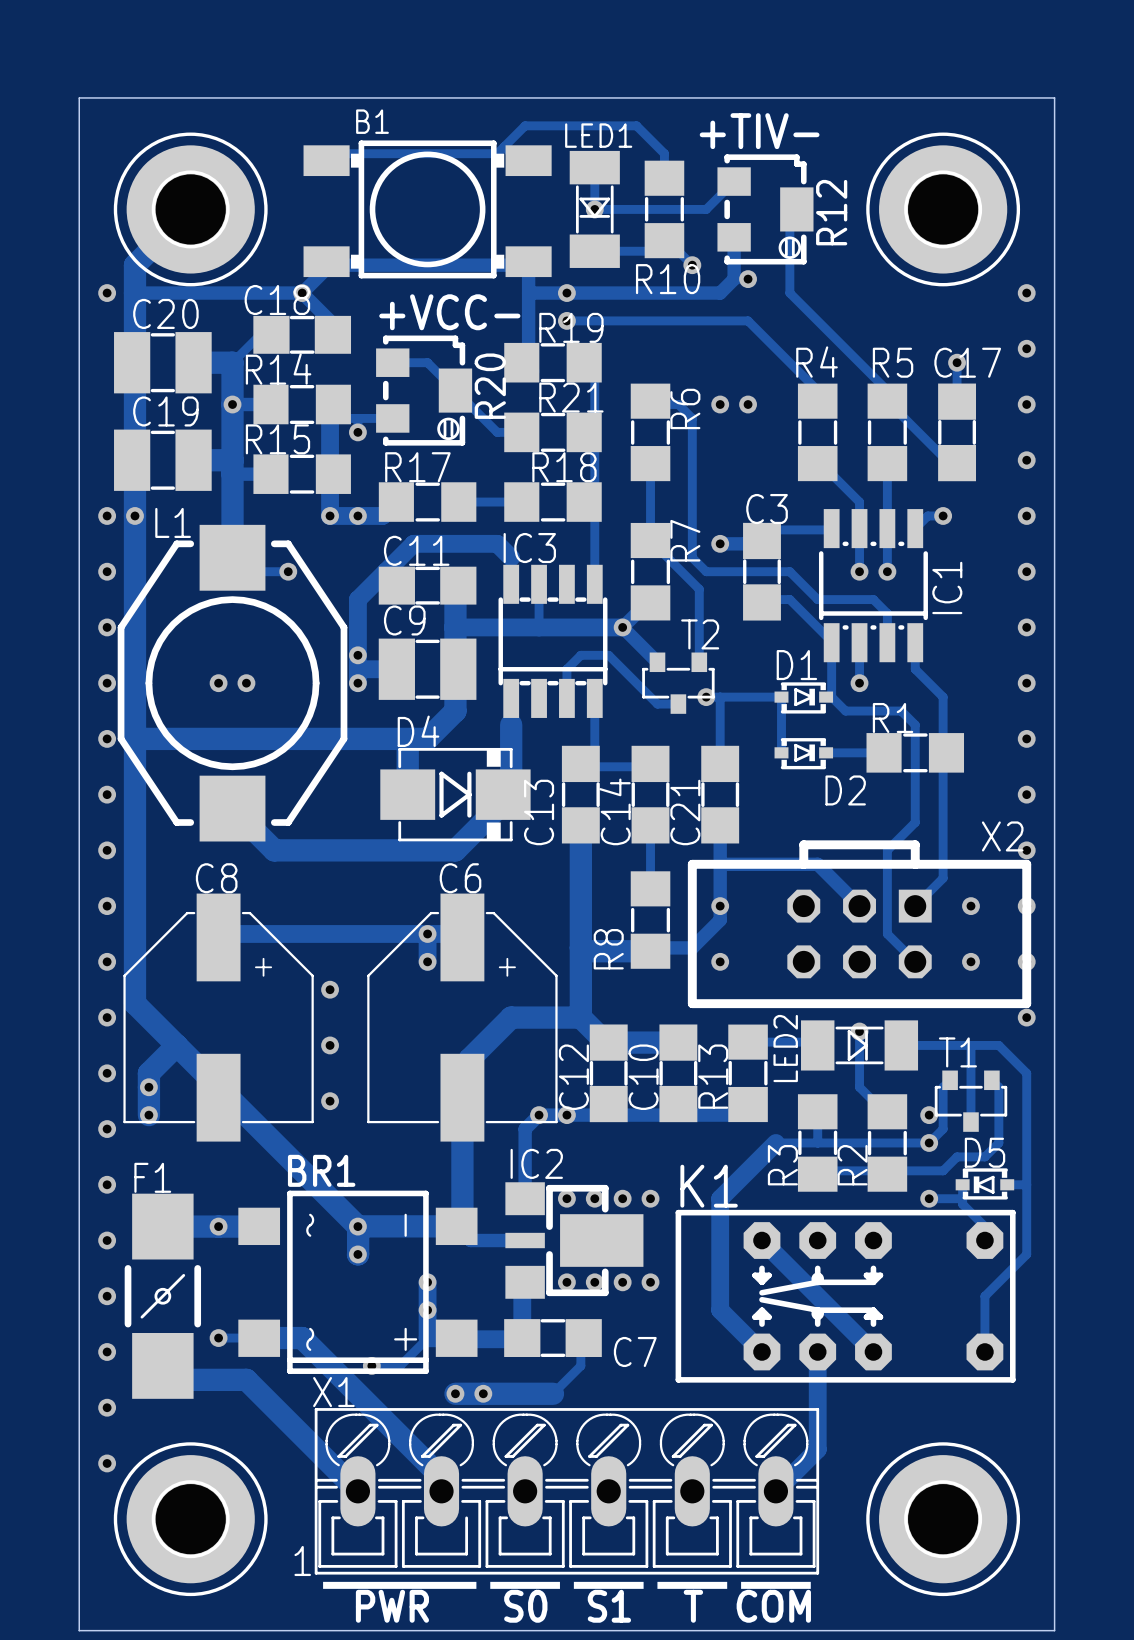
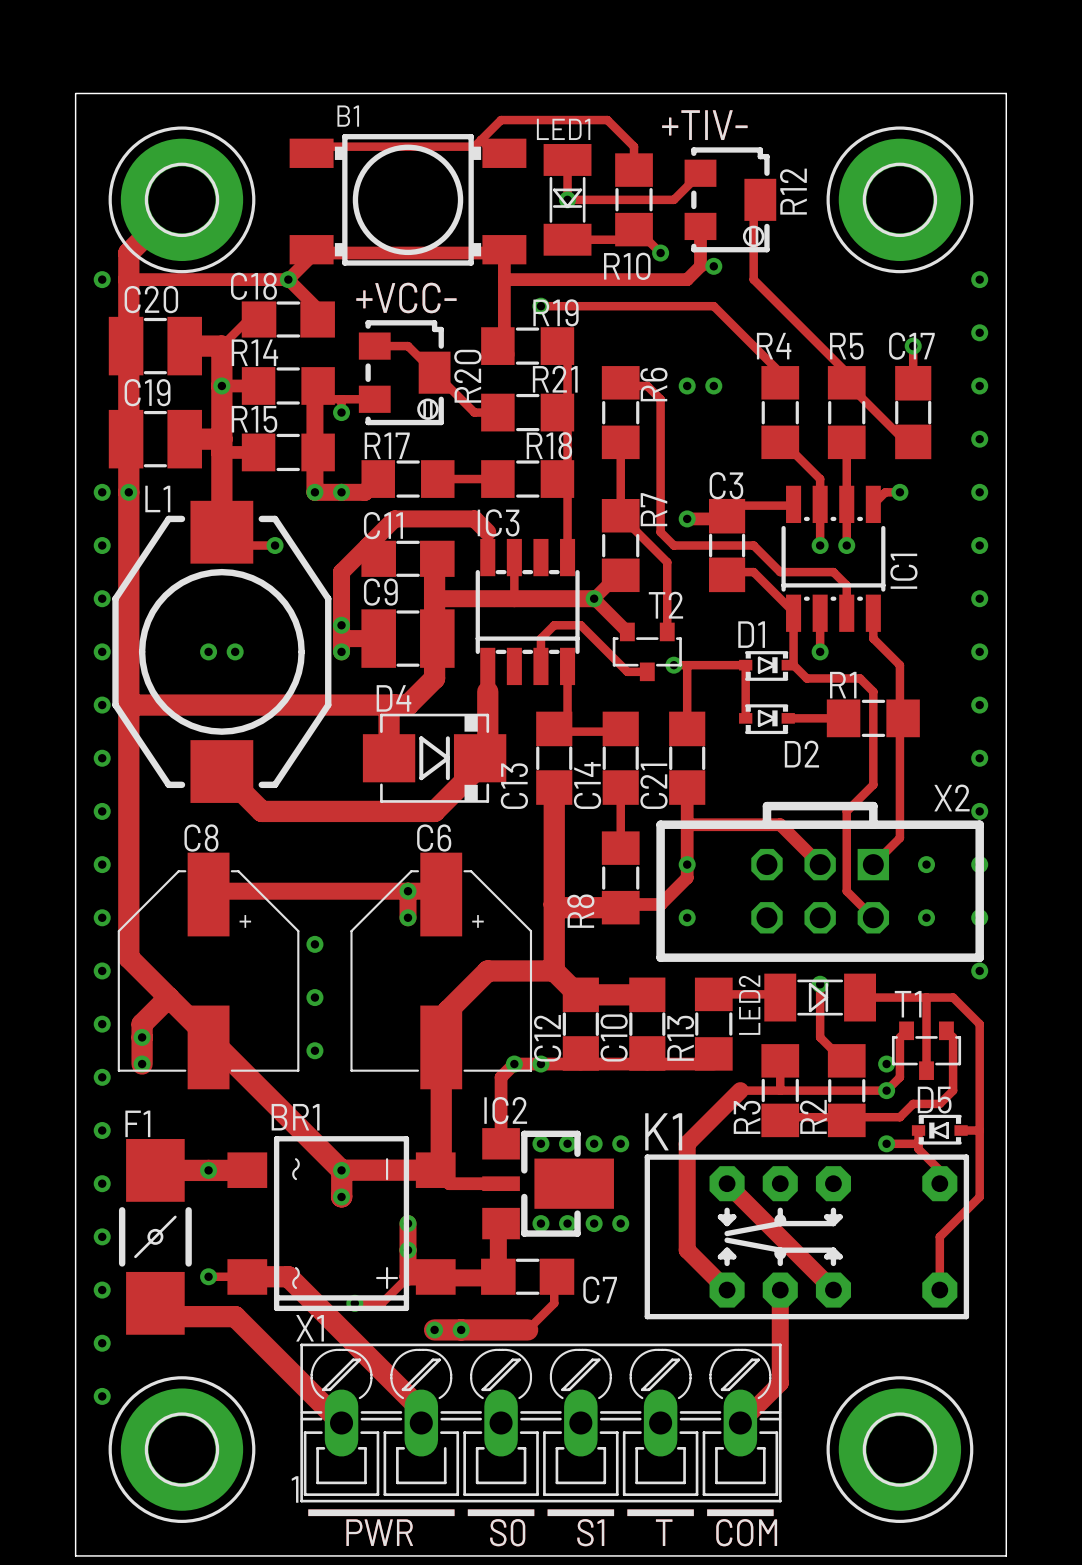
via: (566, 293) -> none

